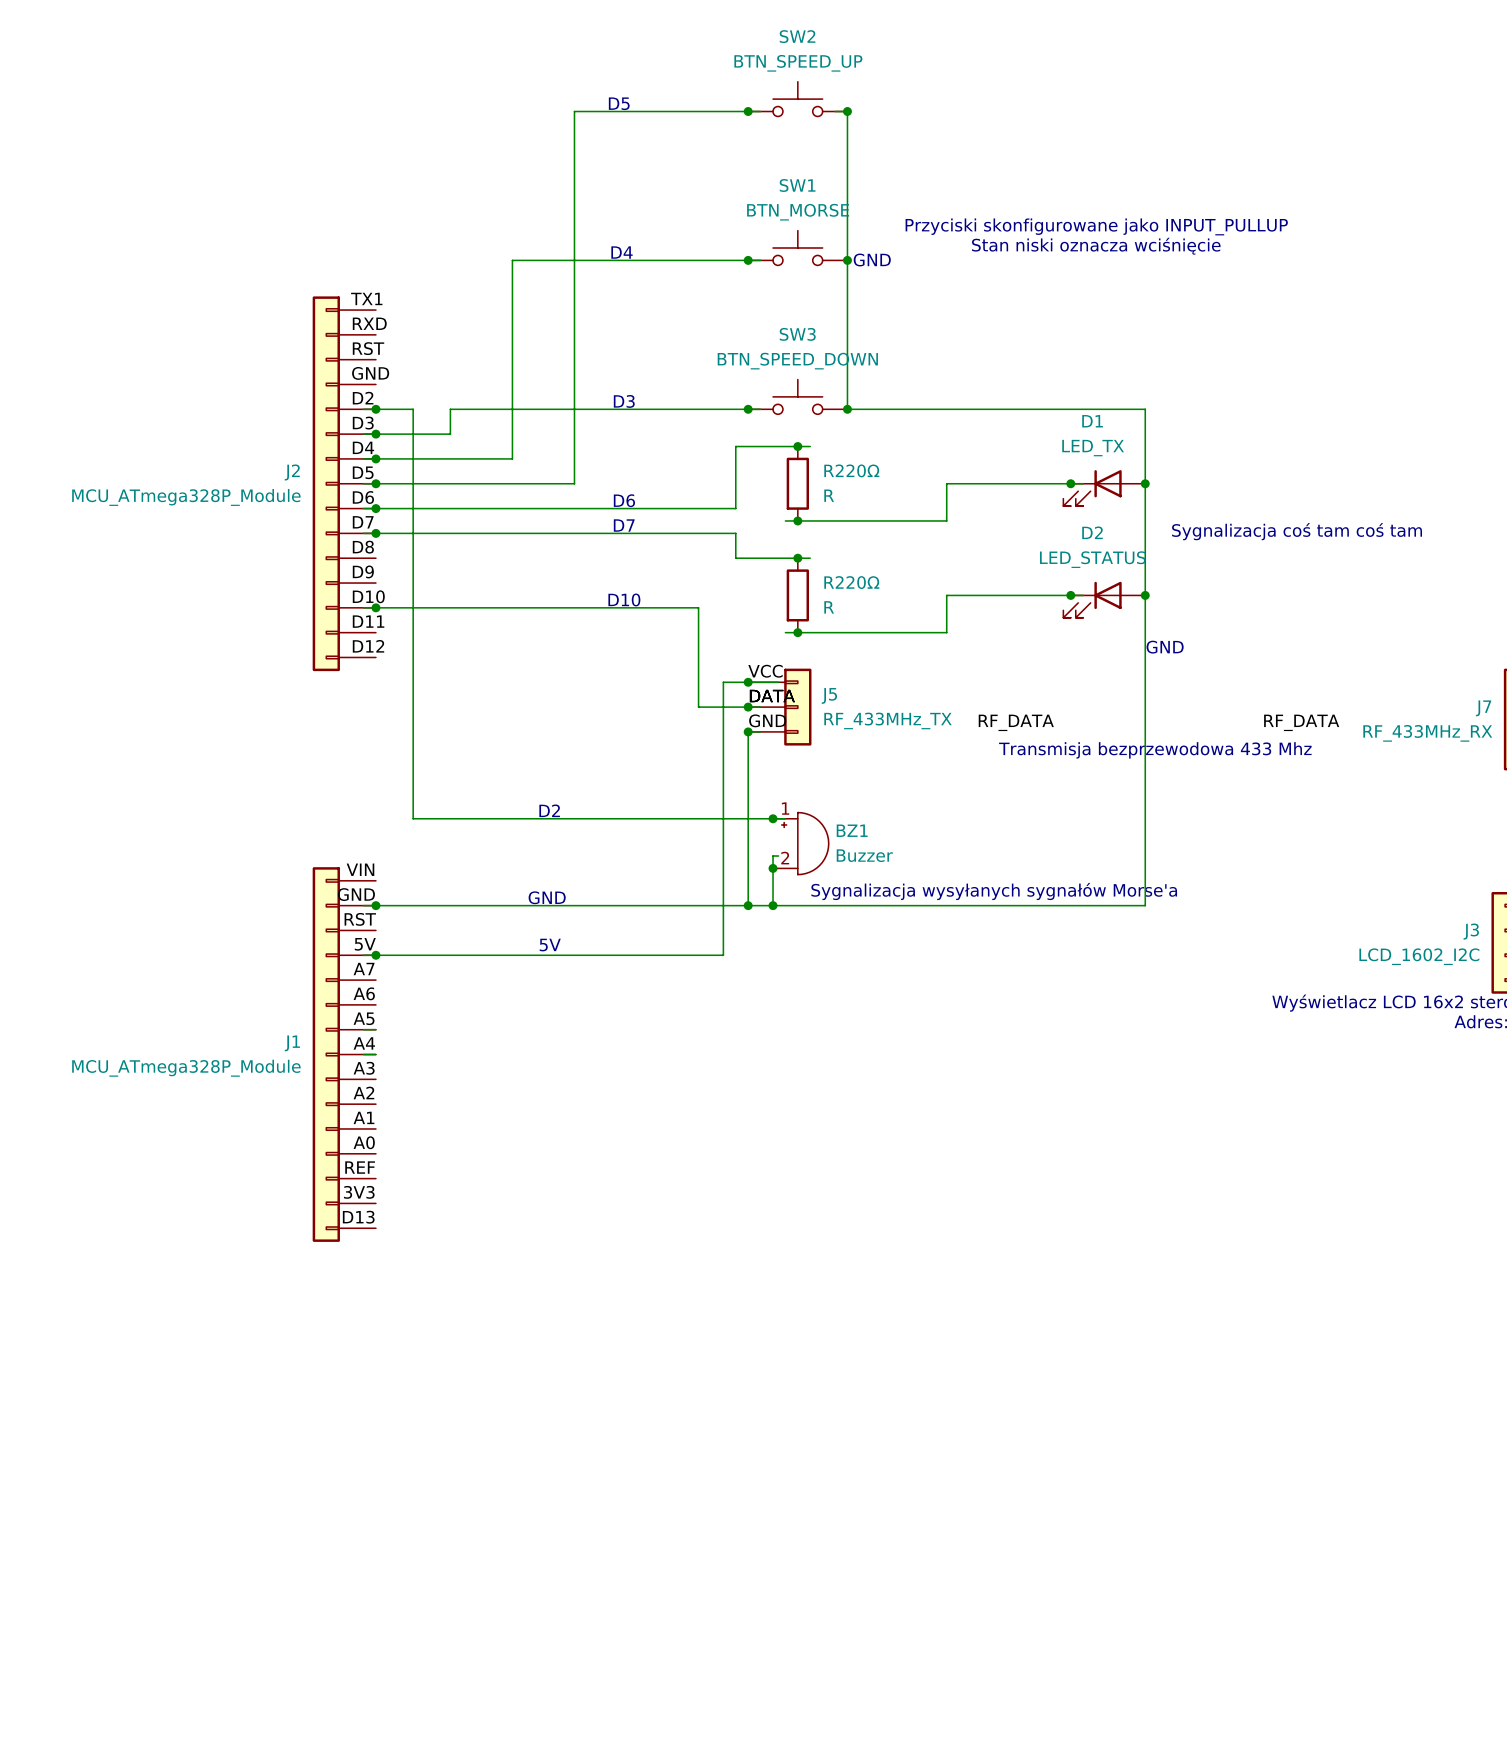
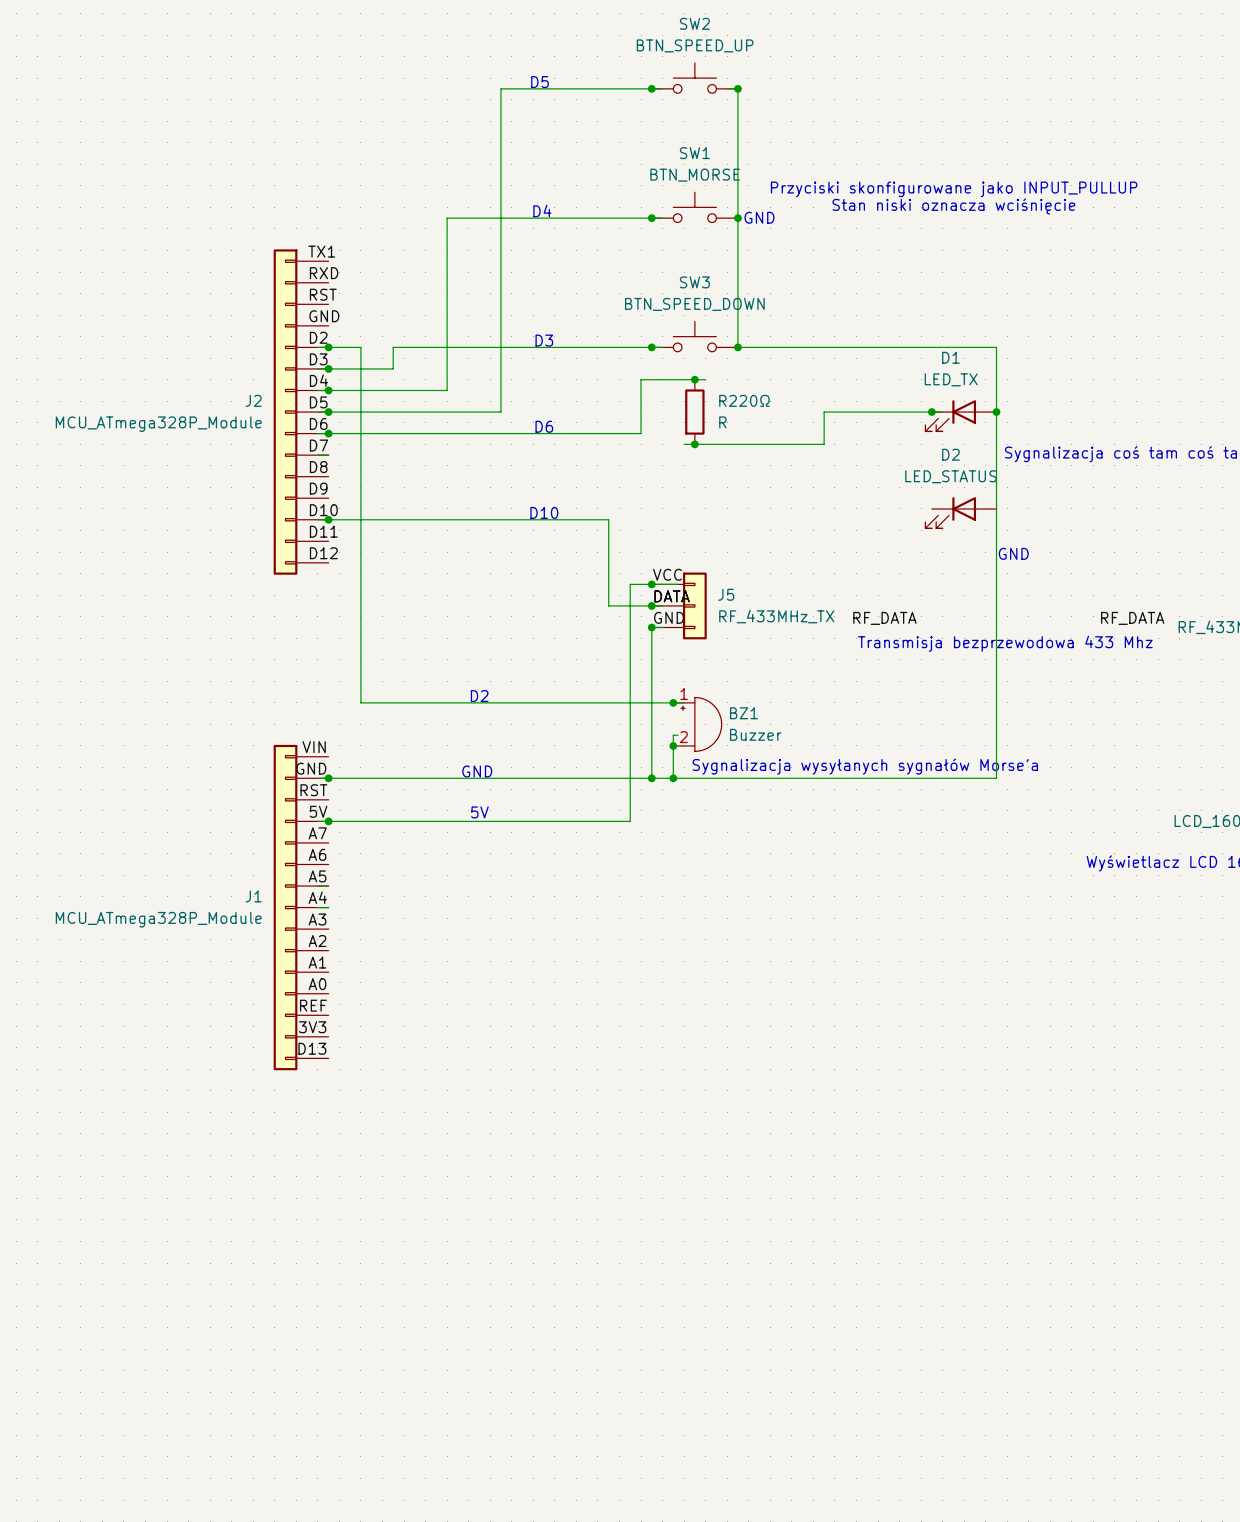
text: D7 (624, 525) -> none
wire: (375, 533) (735, 533) (735, 558) (810, 558) -> none
junction: (375, 533) -> none
junction: (797, 558) -> none
R220Ω: R (797, 595) -> none
junction: (1070, 595) -> none
wire: (1083, 595) (946, 595) (946, 632) (785, 632) -> none
junction: (1145, 595) -> none
junction: (797, 632) -> none

